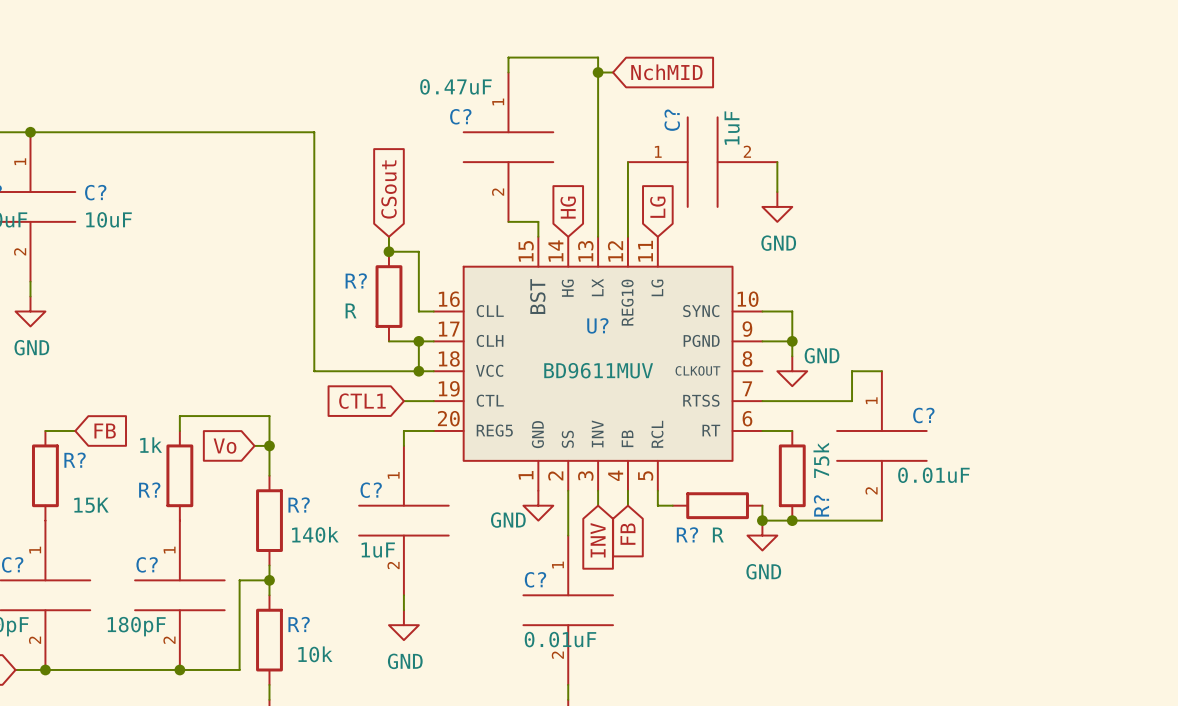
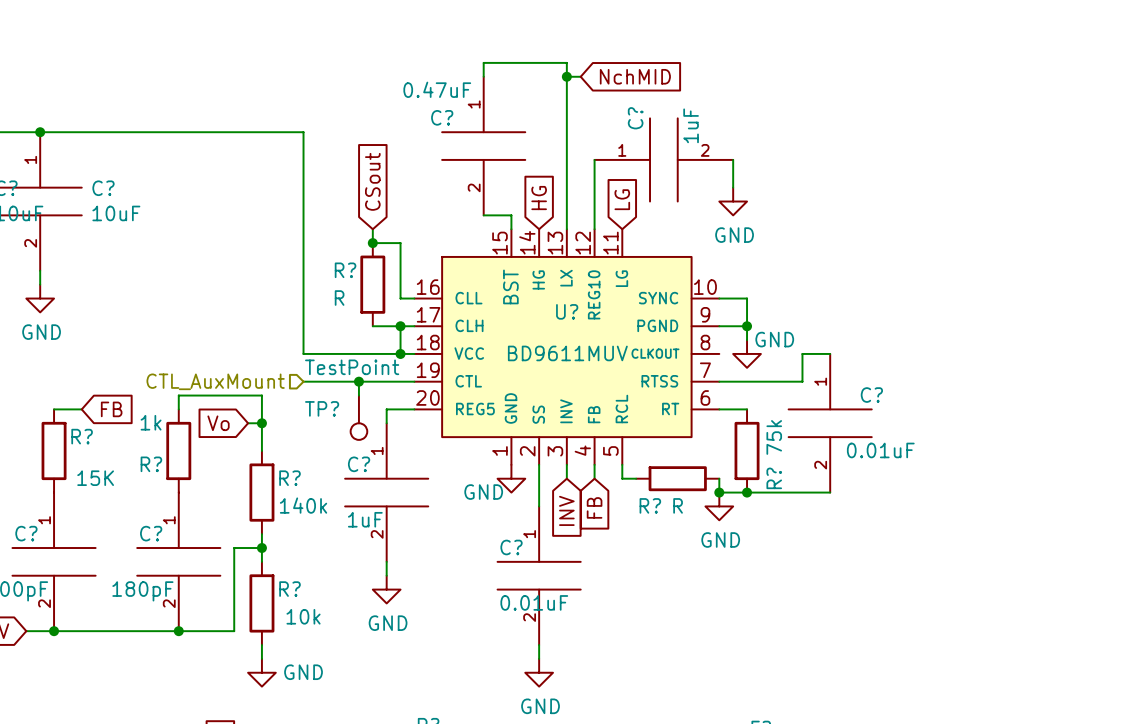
wire: none -> (303, 381) (386, 381)
global label: CTL1 (362, 401) -> none
wire: none -> (358, 381) (358, 395)
junction: none -> (358, 381)
hierarchical label: none -> CTL_AuxMount (215, 381)
TP?: none -> TestPoint (358, 417)

